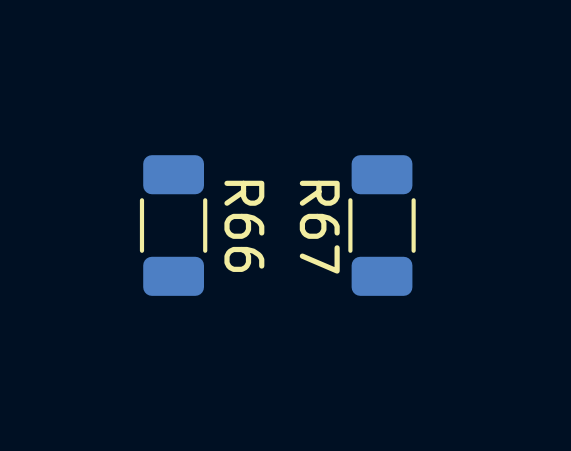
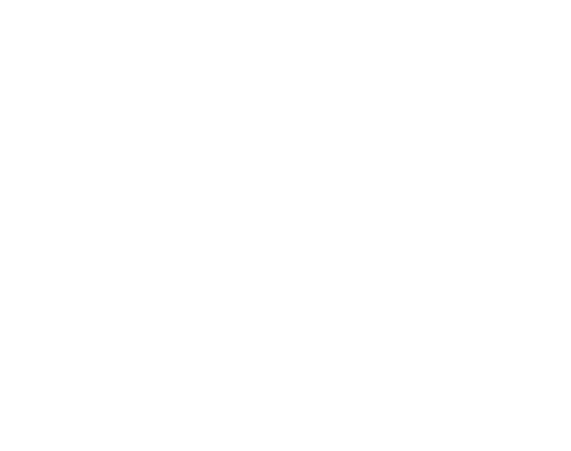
R66: (173, 225) -> none
R67: (382, 225) -> none

